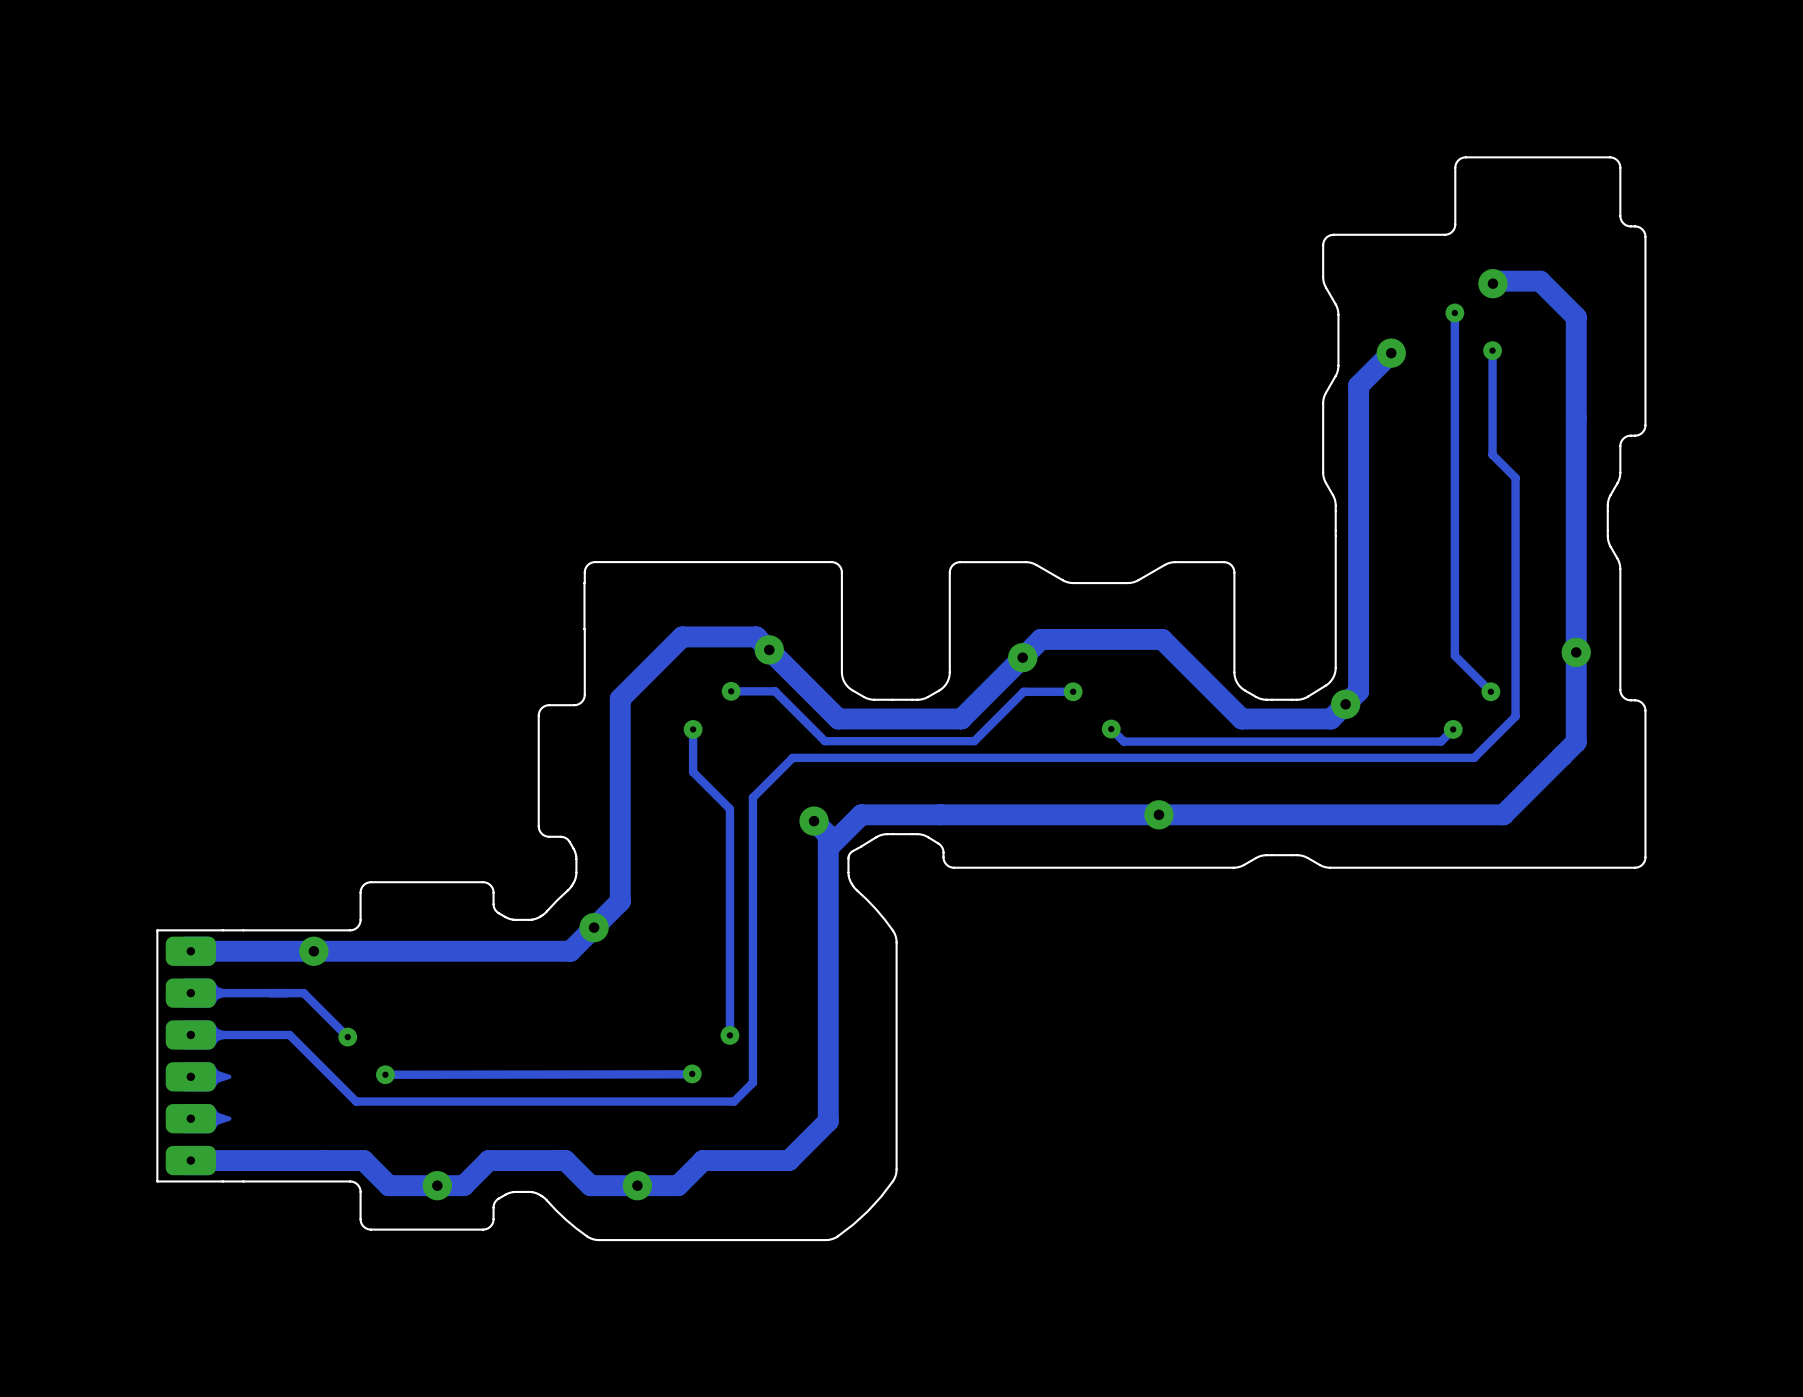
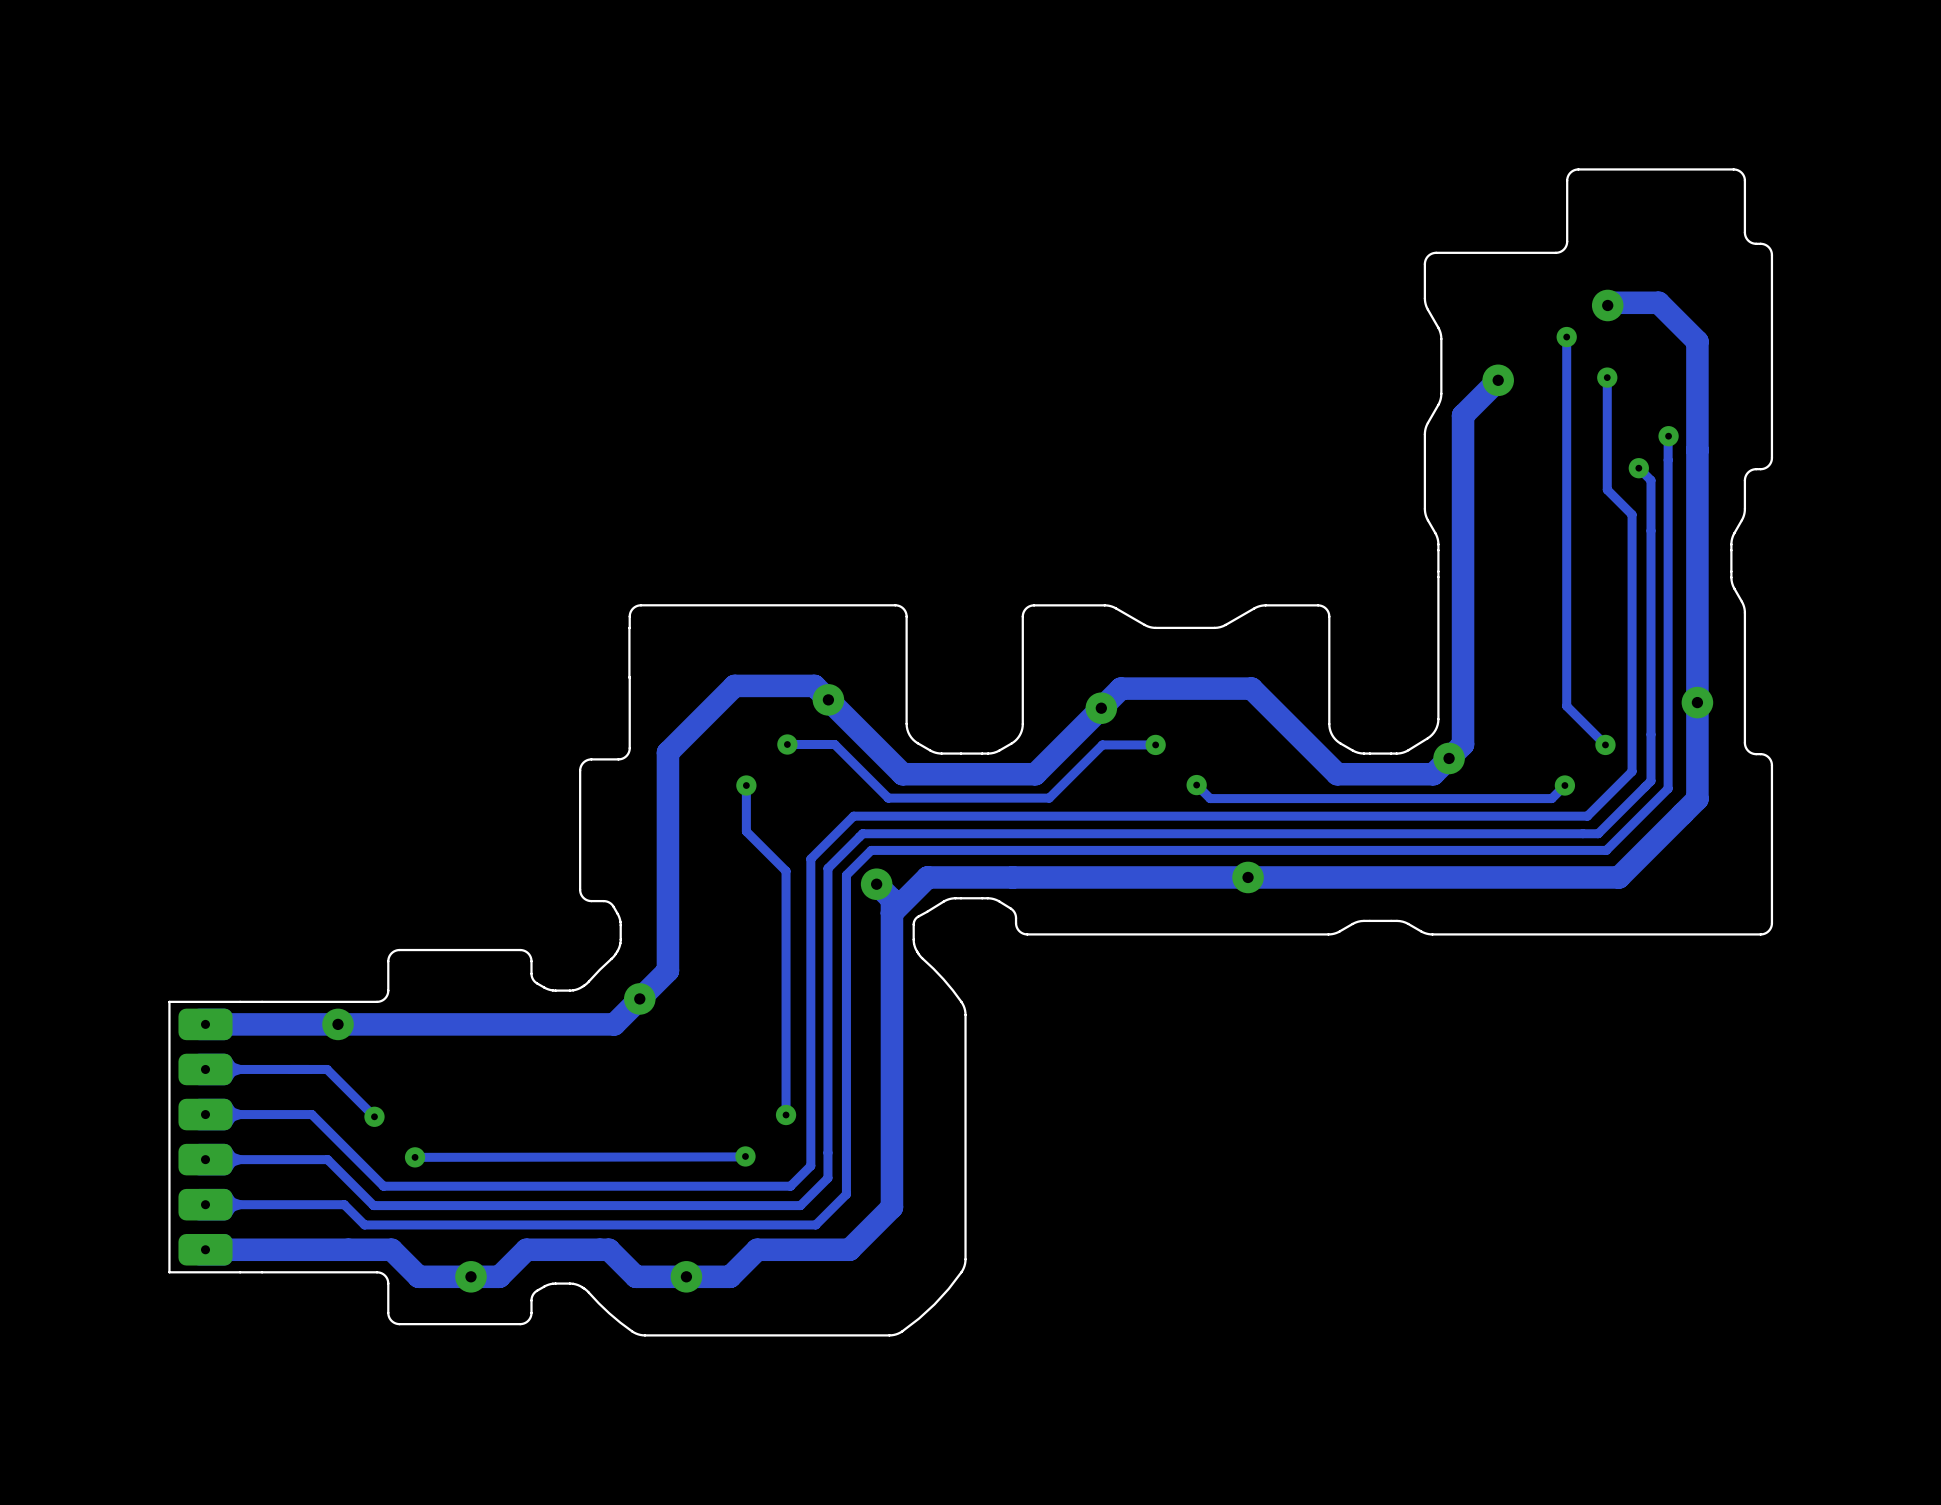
track: none -> (1668, 436) (1668, 788) (1606, 850) (871, 850) (846, 875) (846, 1194) (815, 1224) (364, 1224) (344, 1204) (218, 1204)
via: none -> (1668, 436)
track: none -> (1638, 468) (1650, 480) (1650, 781) (1598, 833) (862, 833) (827, 868) (827, 1178) (800, 1205) (373, 1205) (327, 1159) (221, 1159)
via: none -> (1638, 468)

